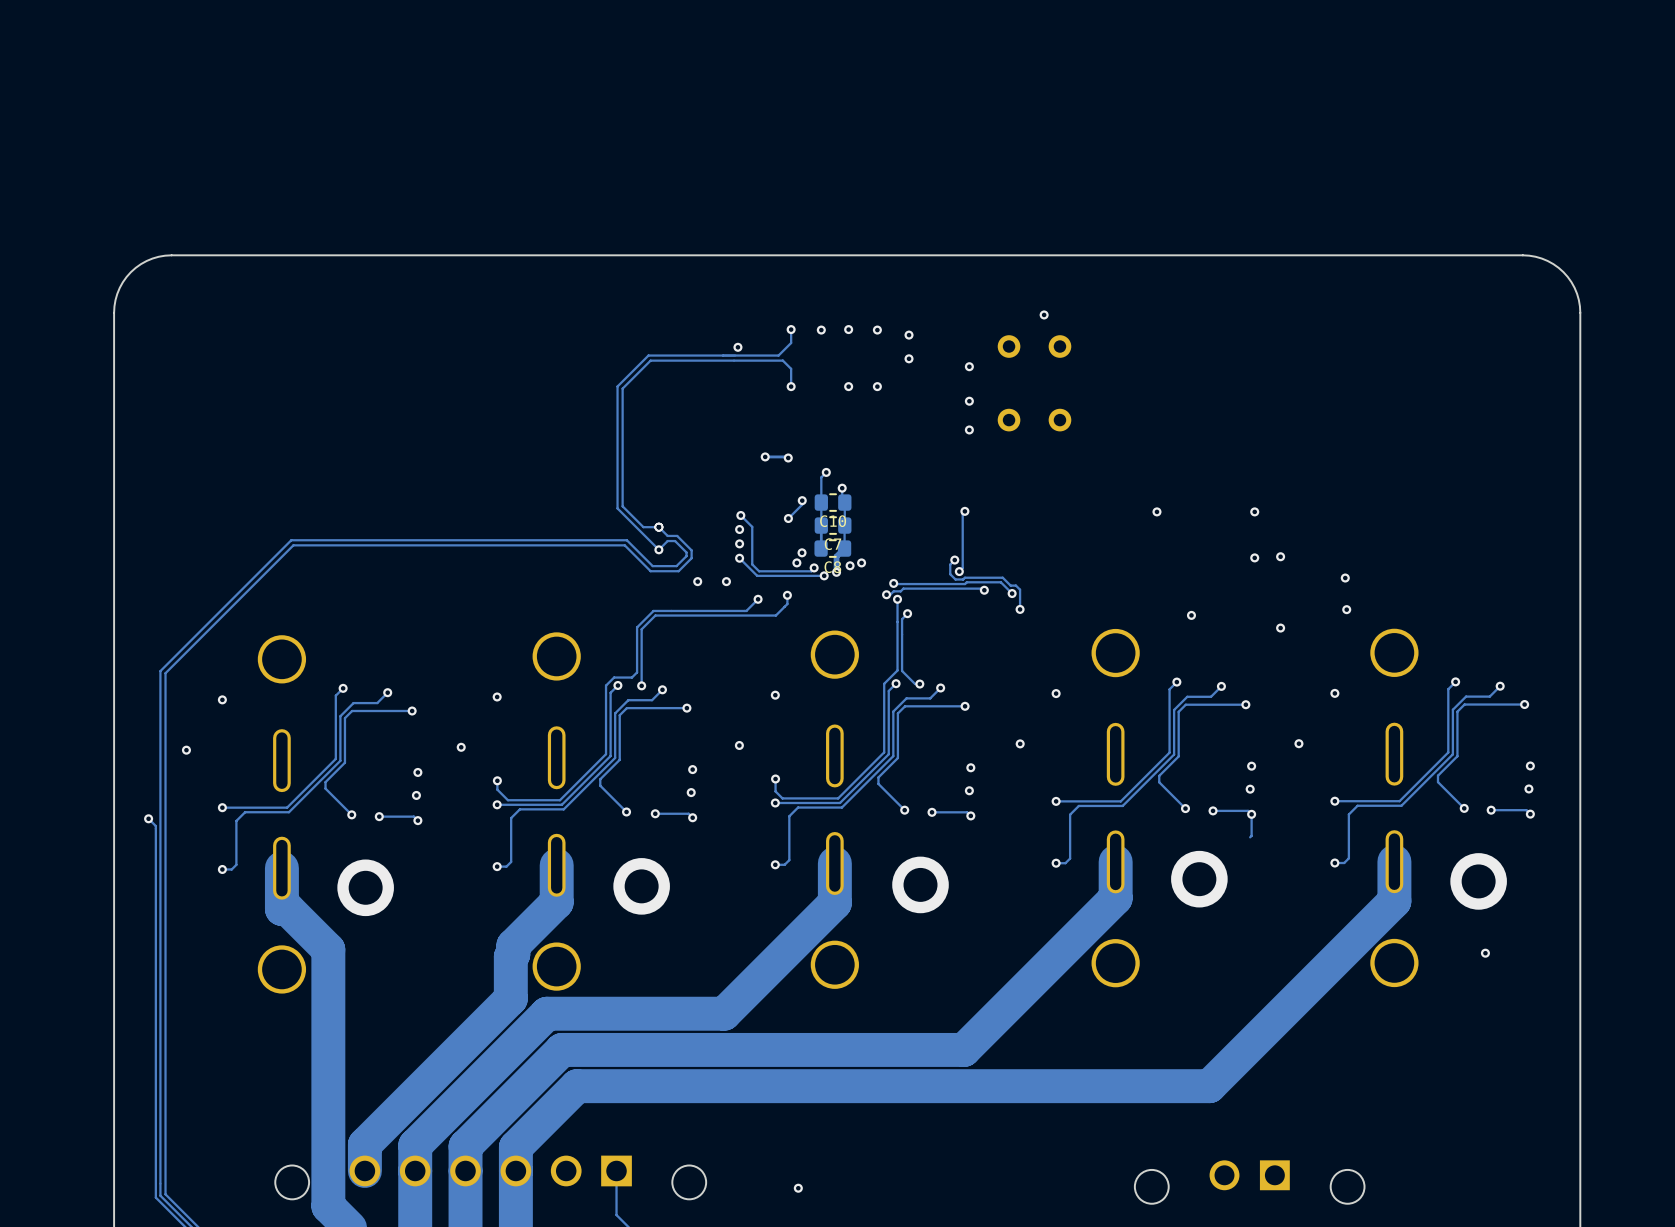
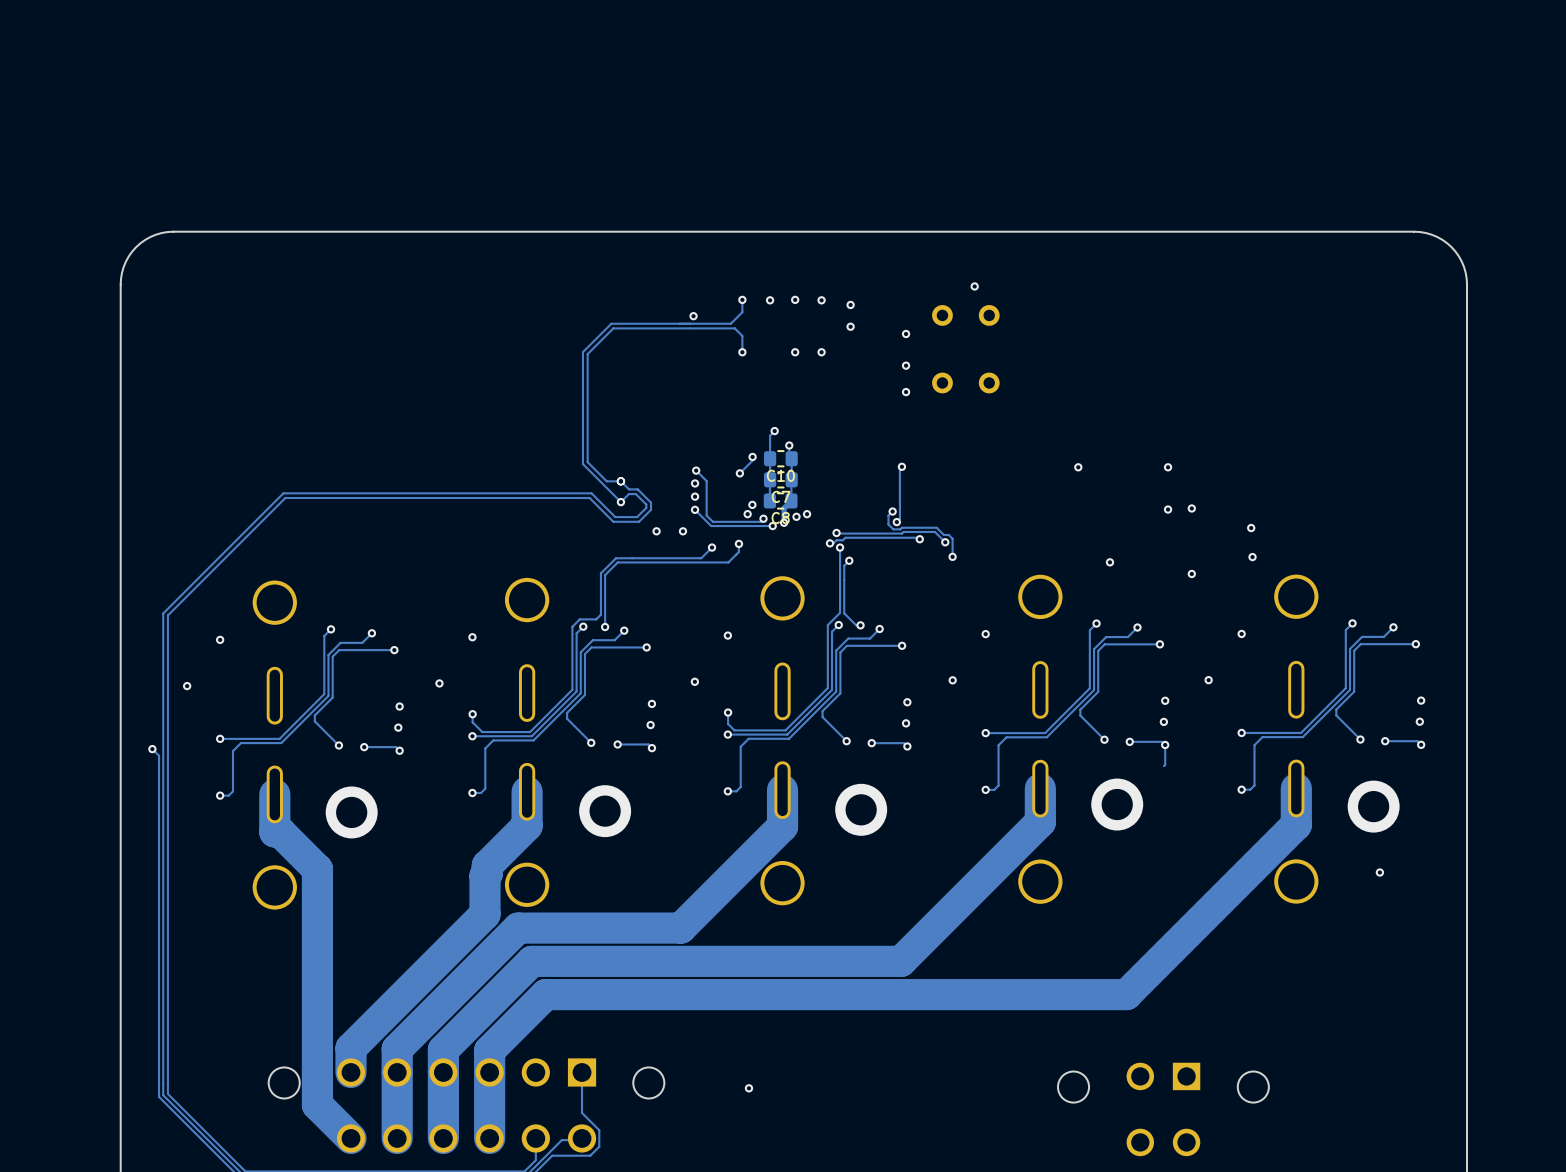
track: (765, 456) (788, 457) -> none
via: (765, 456) -> none
via: (788, 457) -> none

